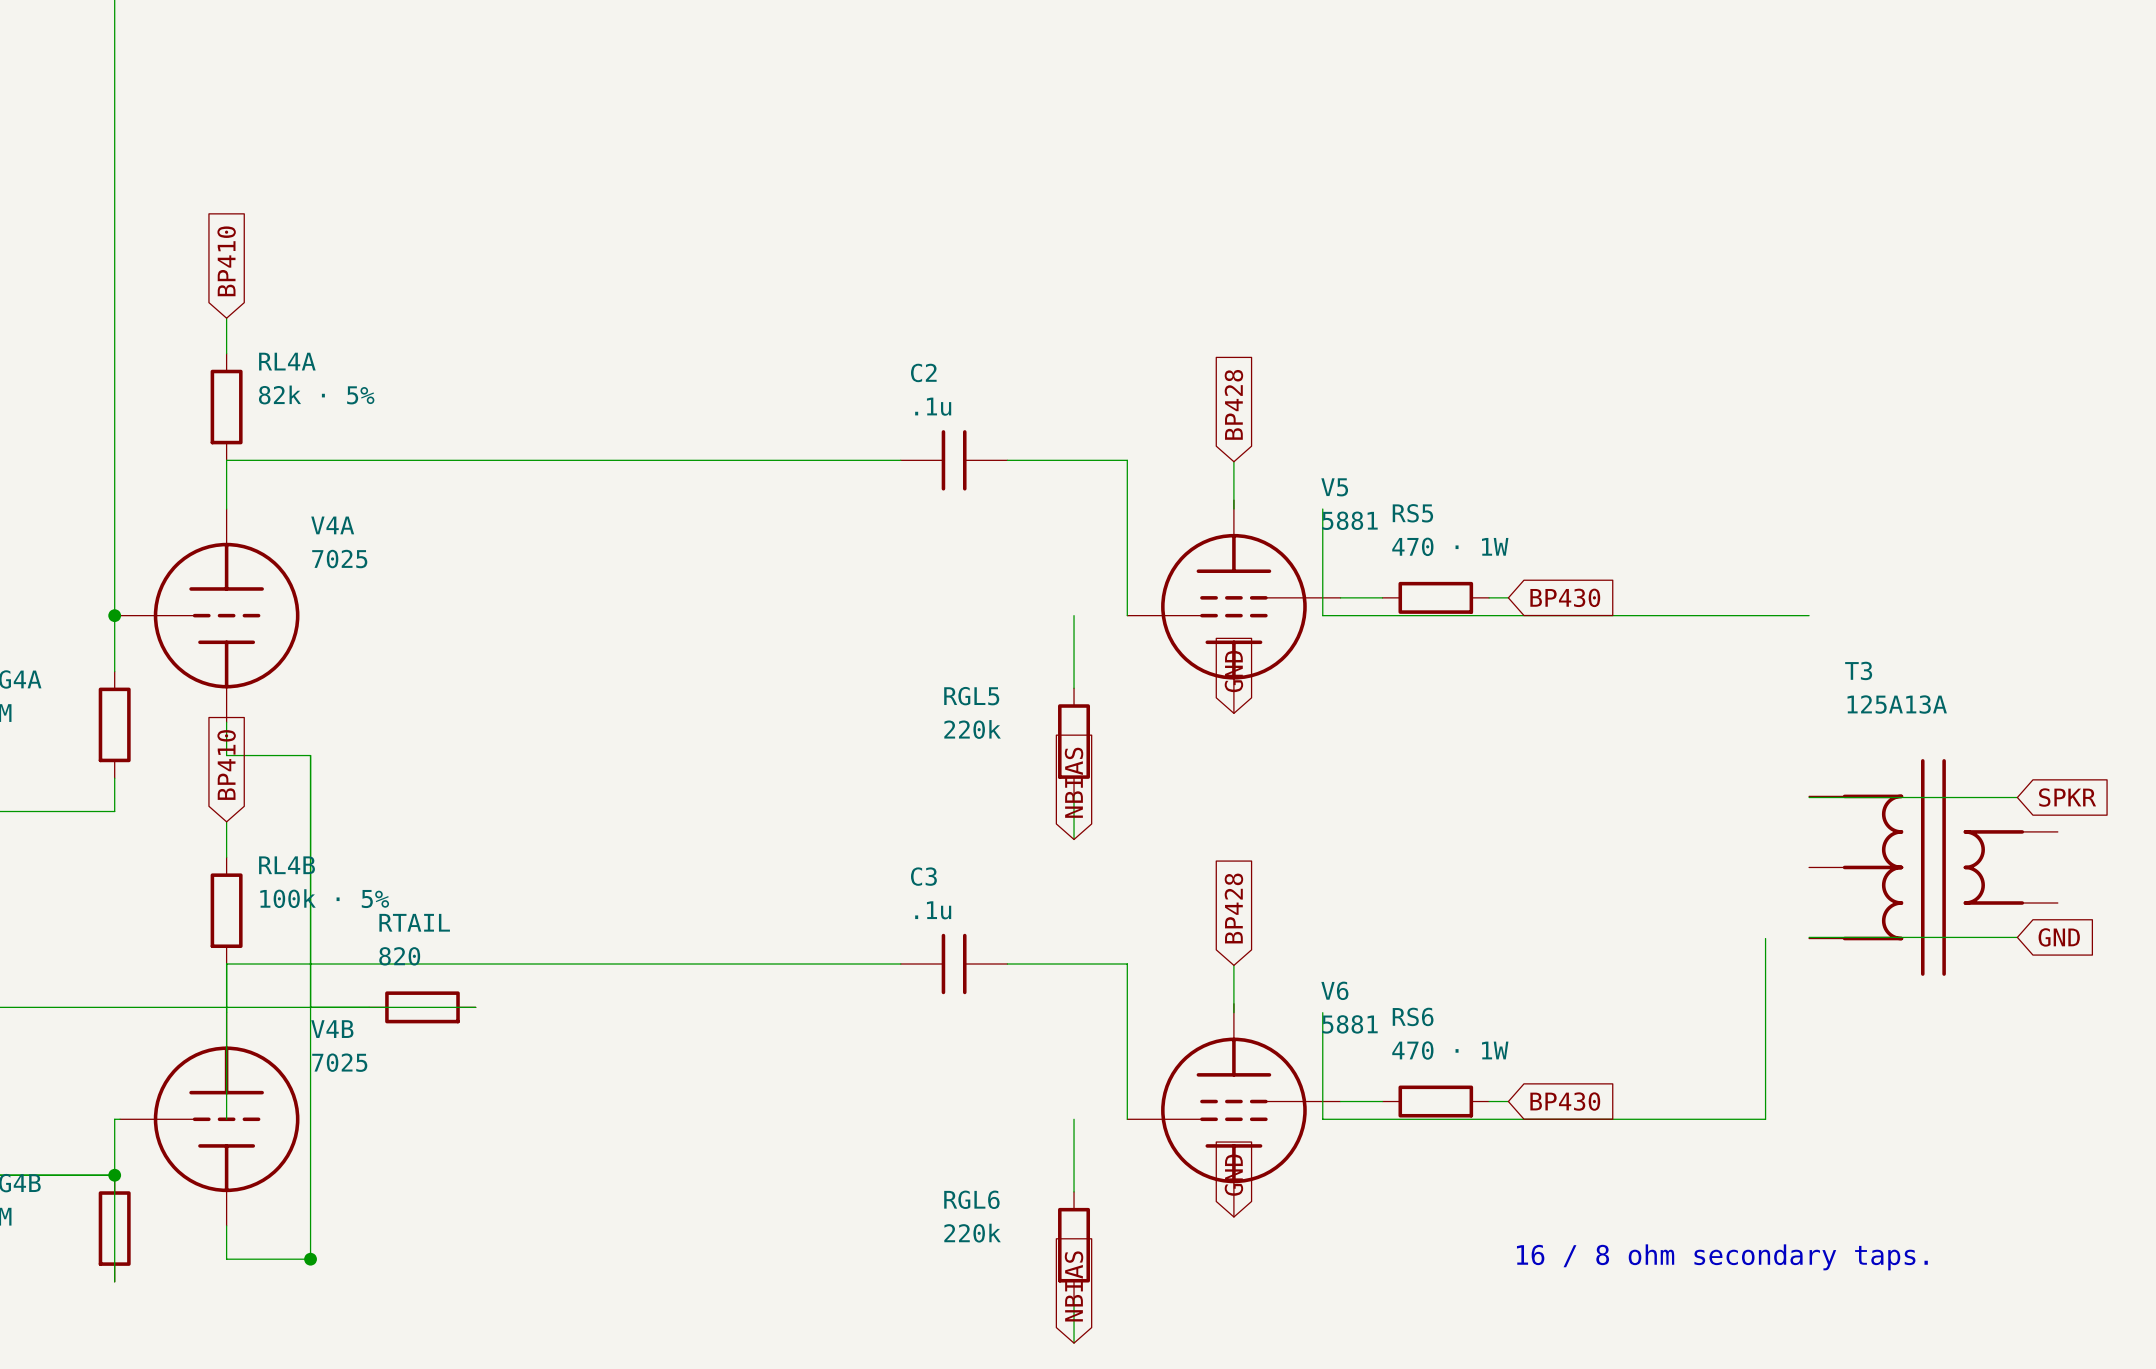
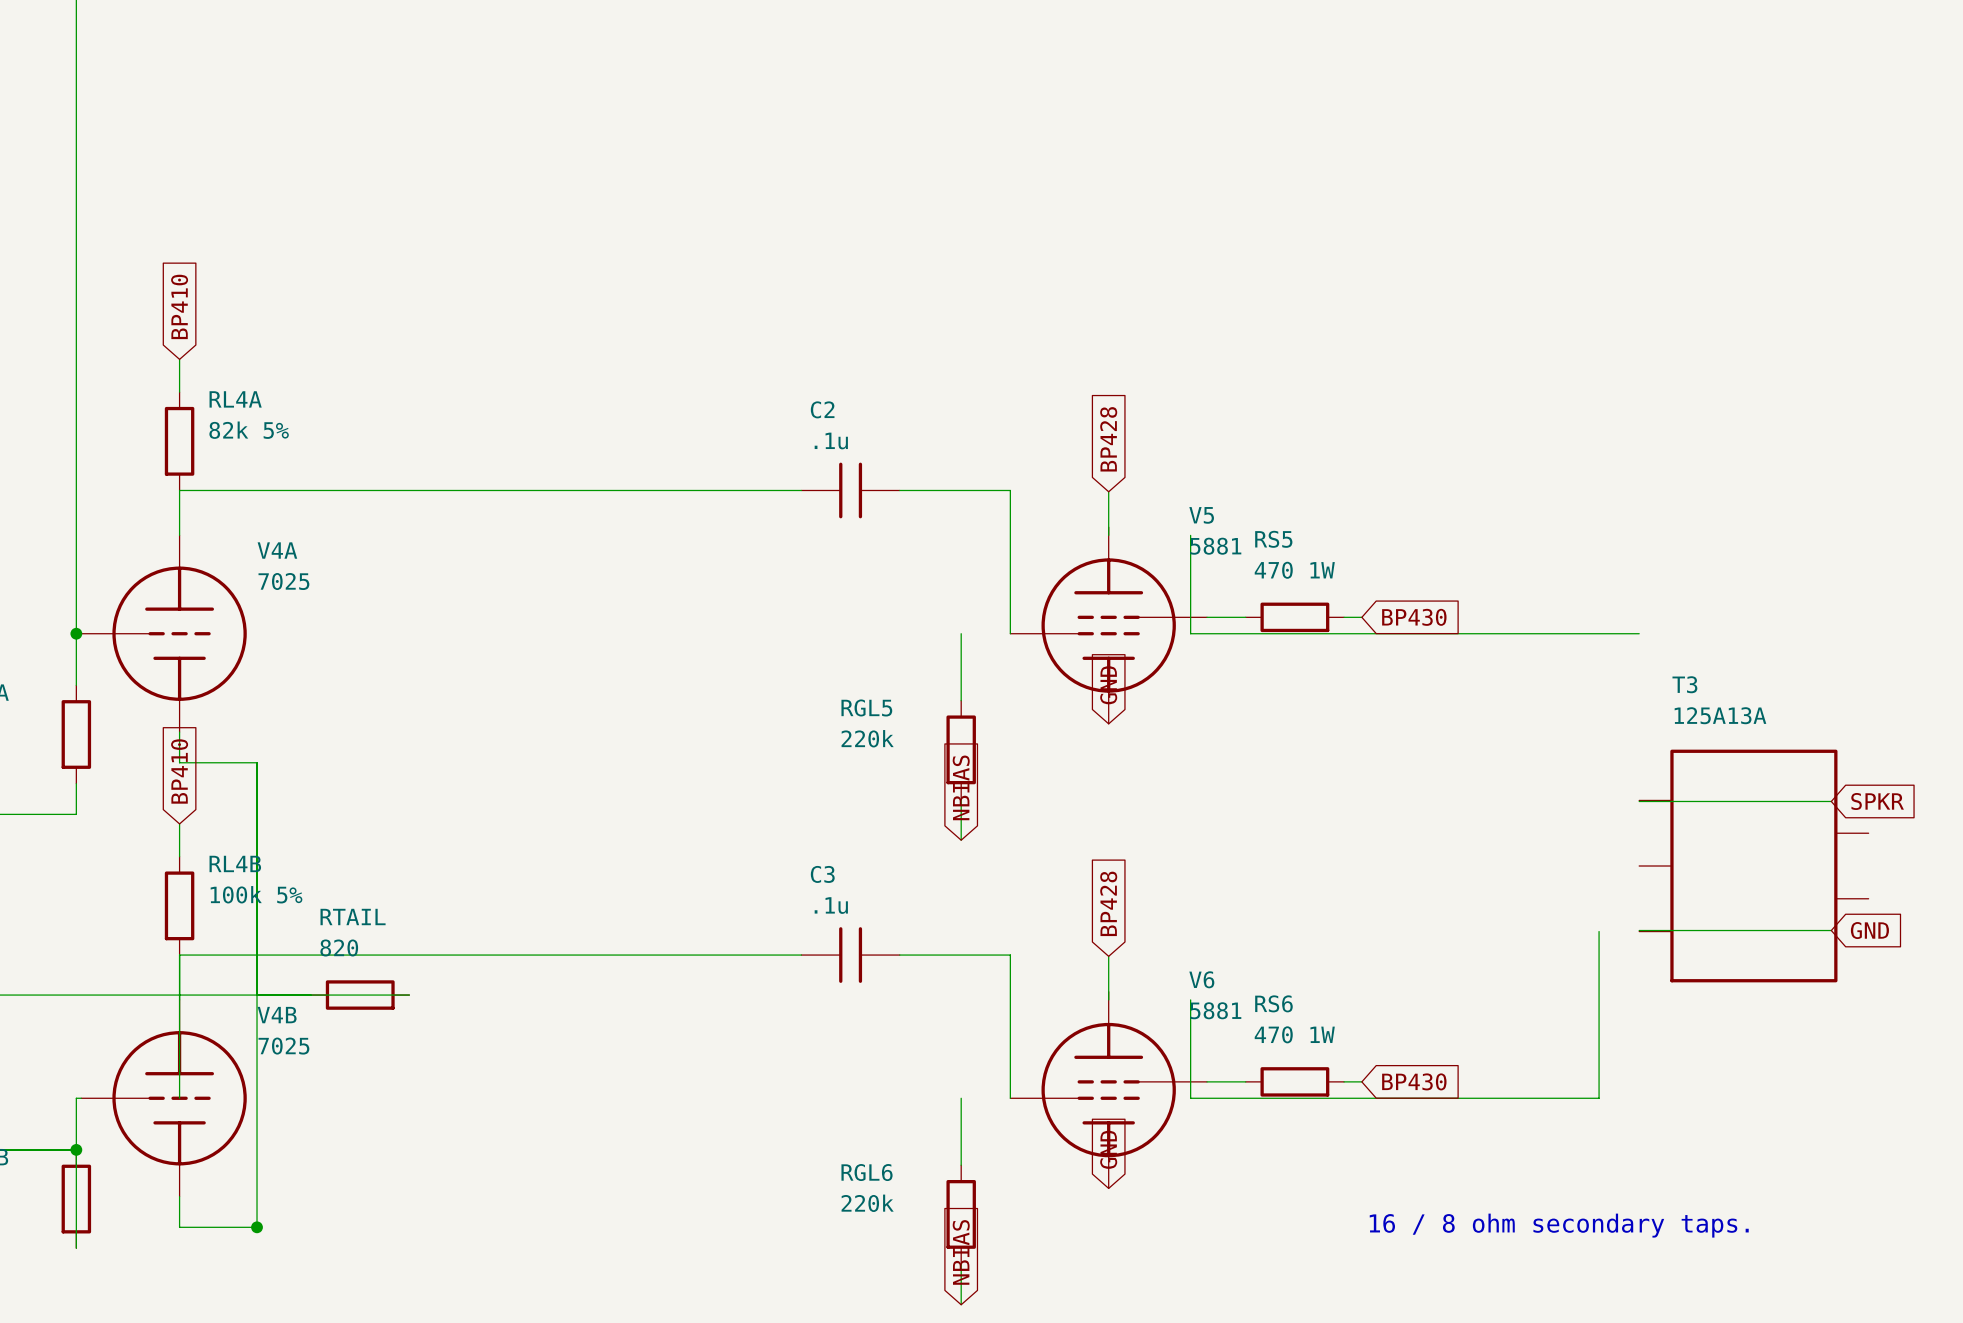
RL4A value: 82k · 5% (316, 394) -> 82k 5% (249, 430)
RS5 value: 470 · 1W (1450, 546) -> 470 1W (1294, 570)
T3 symbol: [1809, 759, 2058, 976] -> [1639, 749, 1869, 983]
RL4B value: 100k · 5% (324, 898) -> 100k 5% (256, 894)
RS6 value: 470 · 1W (1450, 1050) -> 470 1W (1294, 1034)

